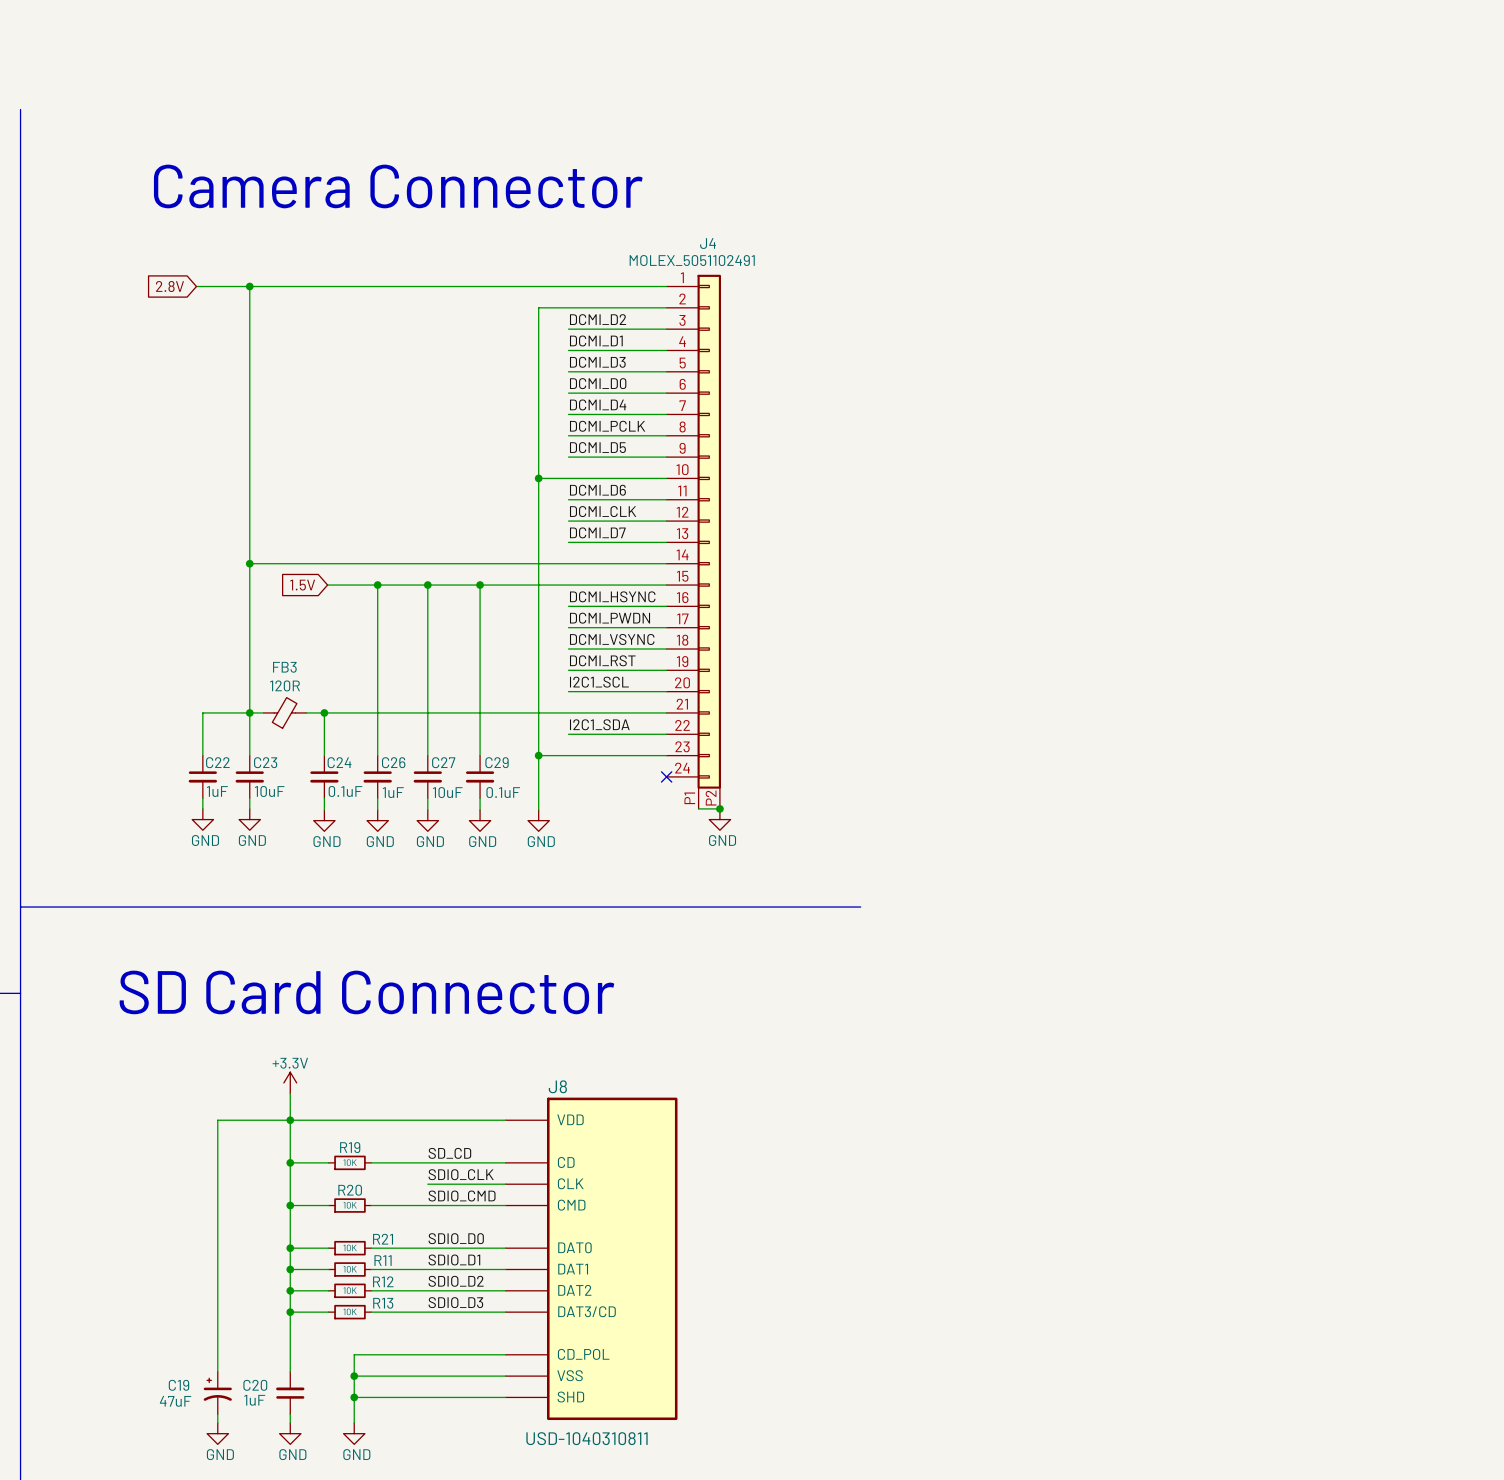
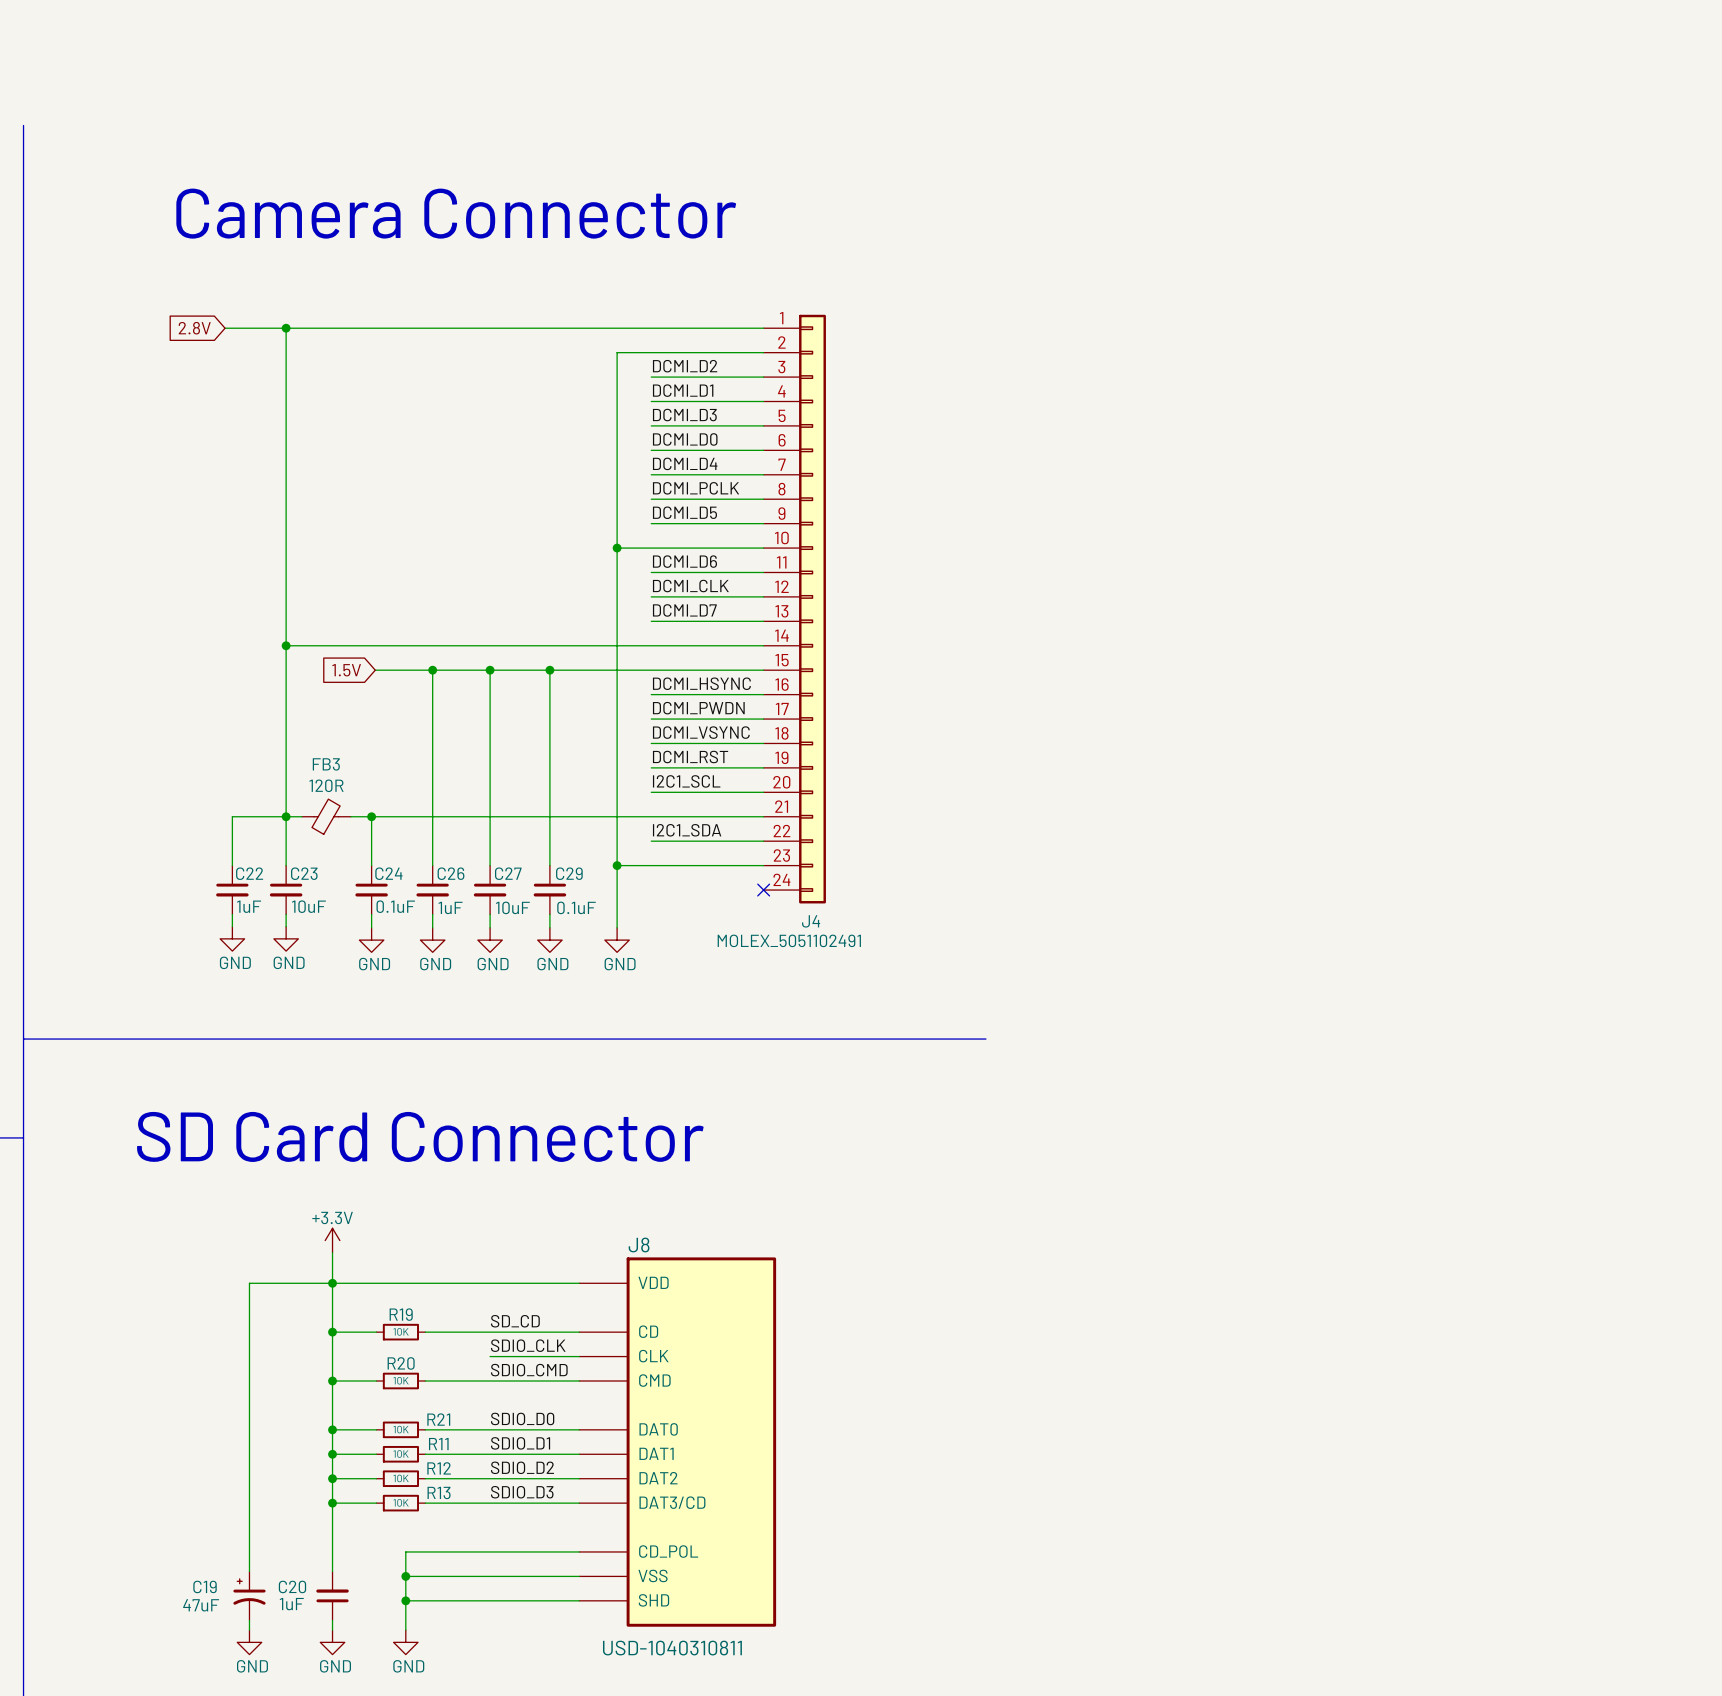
J4 name position: J4 (708, 243) -> J4 (811, 921)
J4 value position: MOLEX_5051102491 (692, 260) -> MOLEX_5051102491 (789, 940)
J4 symbol: [666, 274, 721, 809] -> [763, 314, 826, 904]
wire: (698, 808) (719, 808) -> none
junction: (719, 808) -> none
power symbol: GND (719, 819) -> none

